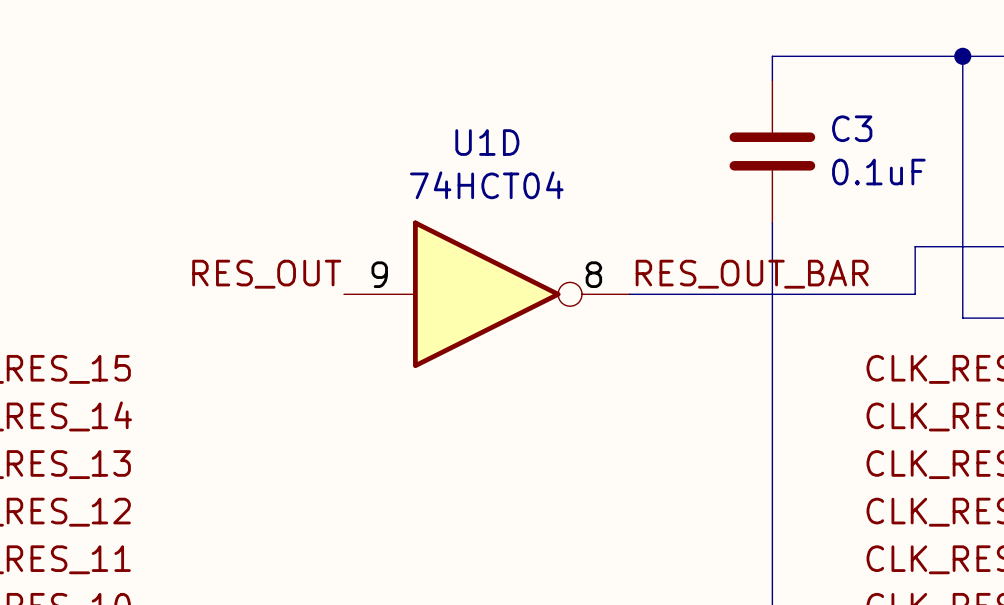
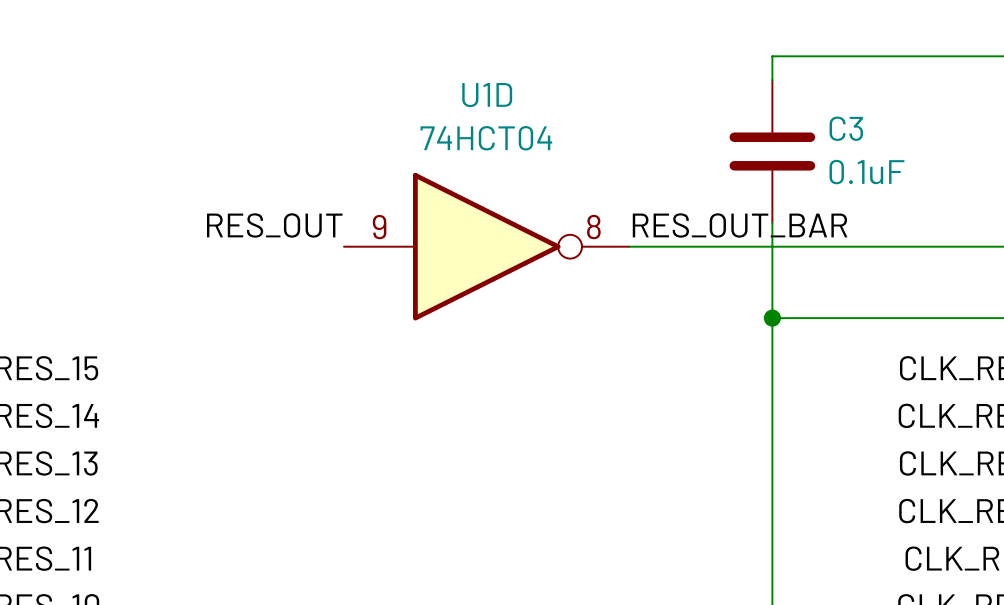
wire: (962, 56) (962, 318) -> (772, 318) (962, 318)
junction: (962, 56) -> none
wire: (915, 246) (915, 294) (629, 294) -> (915, 246) (629, 246)
label position: RES_OUT (266, 274) -> RES_OUT (274, 225)
label position: RES_OUT_BAR (752, 274) -> RES_OUT_BAR (740, 225)
U1D position: (486, 294) -> (486, 246)
junction: none -> (772, 318)

